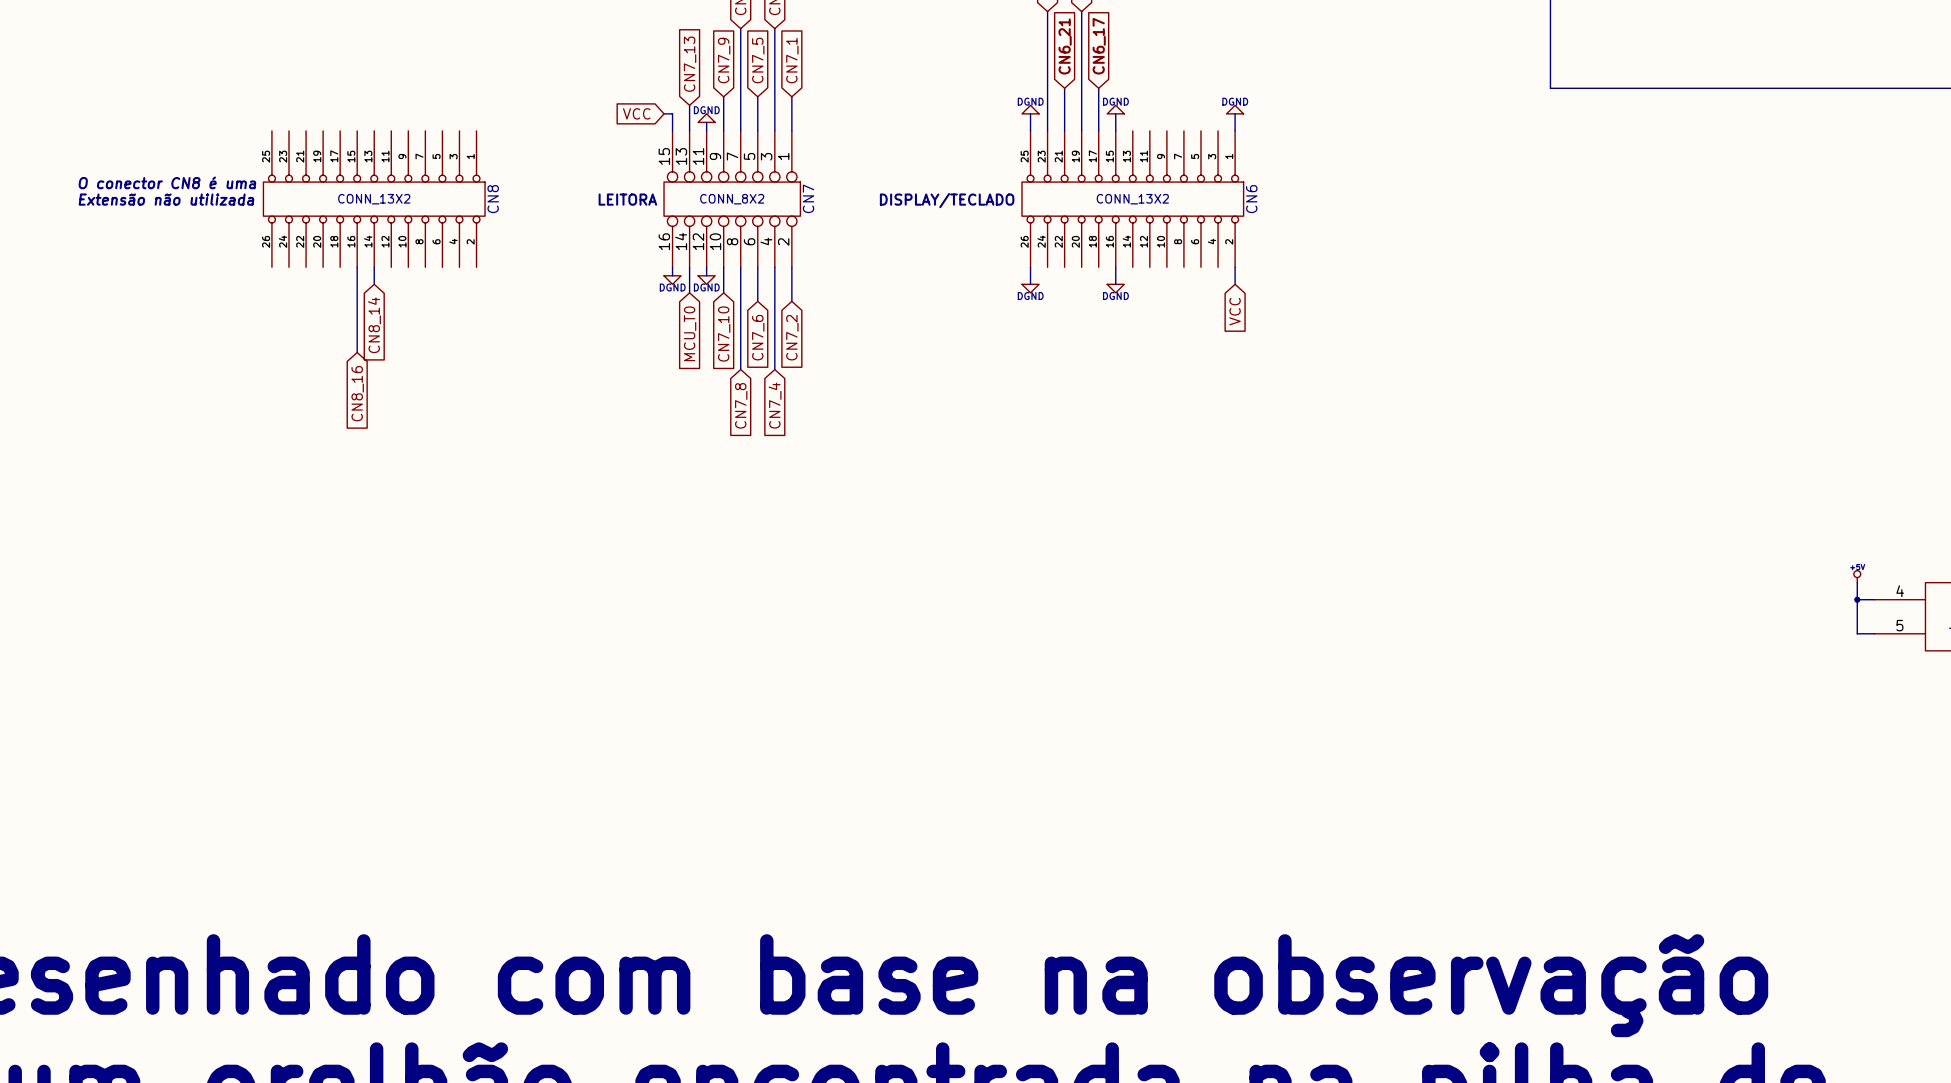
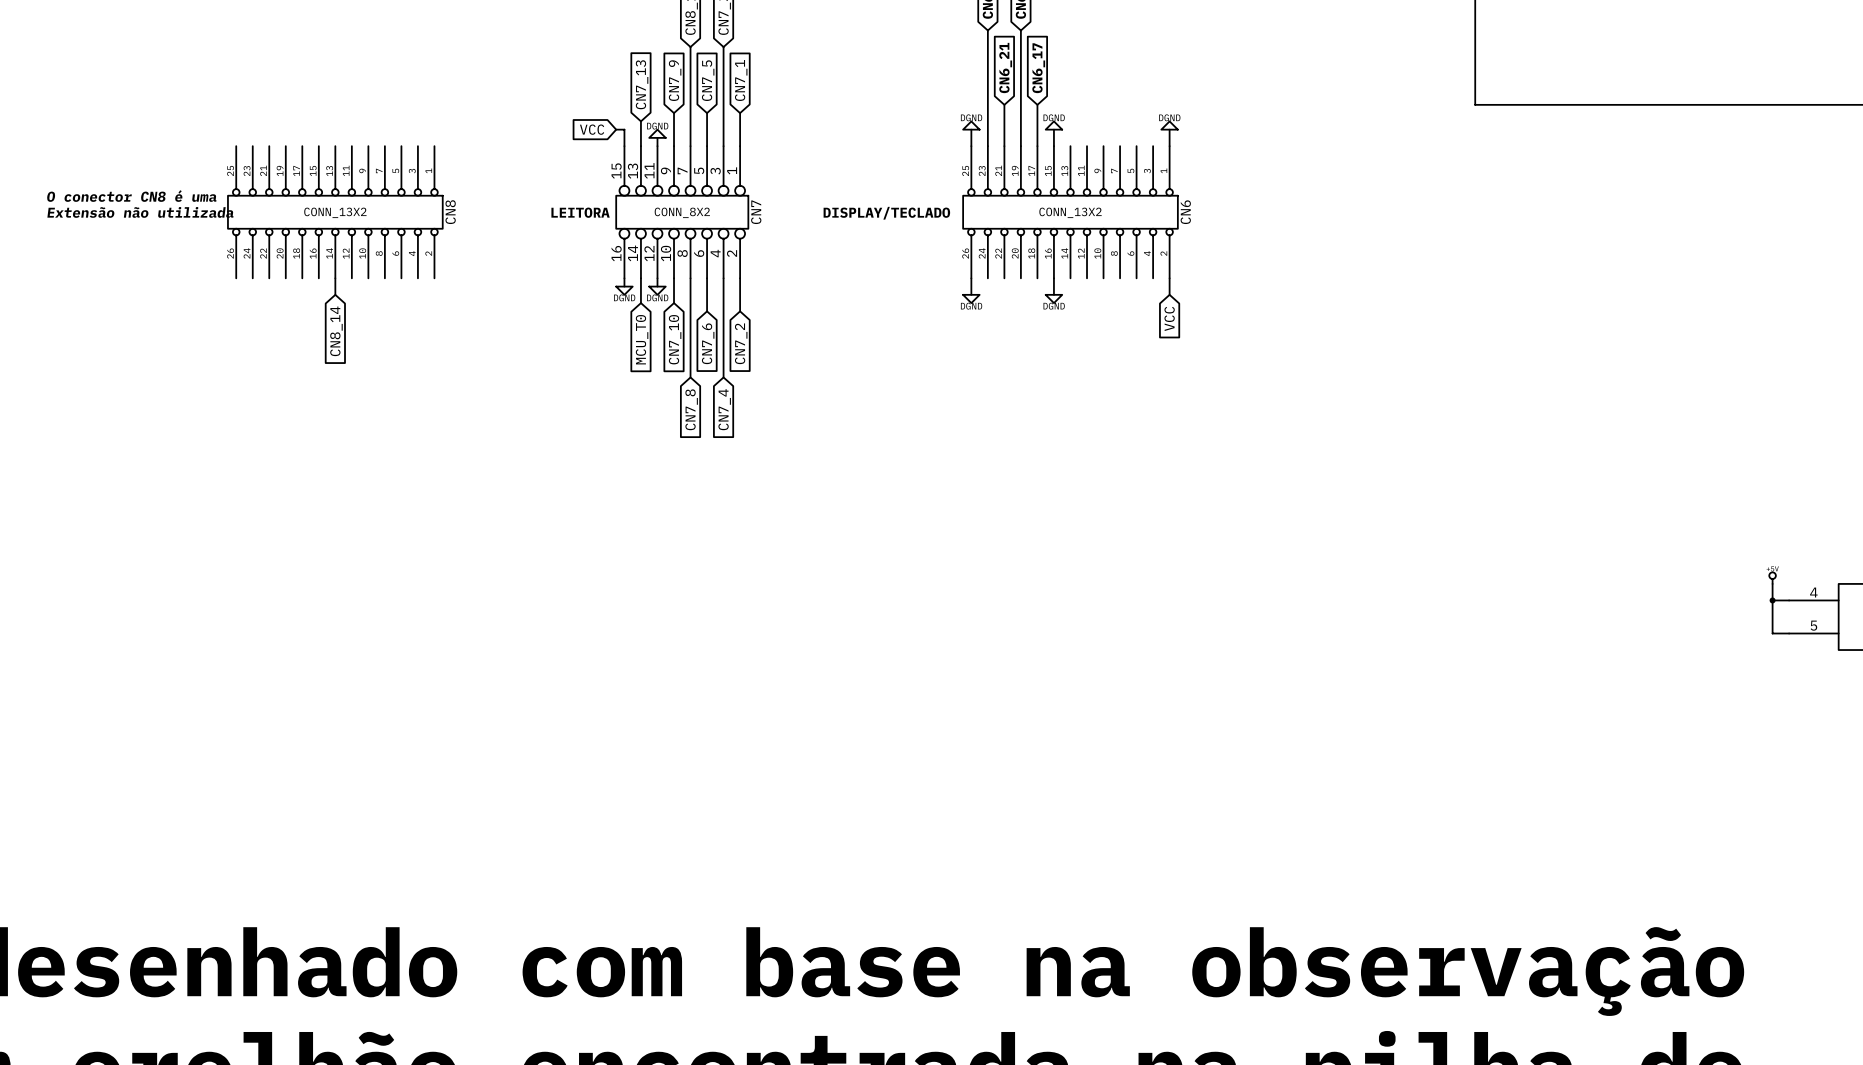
wire: (357, 267) (357, 352) -> none
global label: CN8_16 (357, 393) -> none

